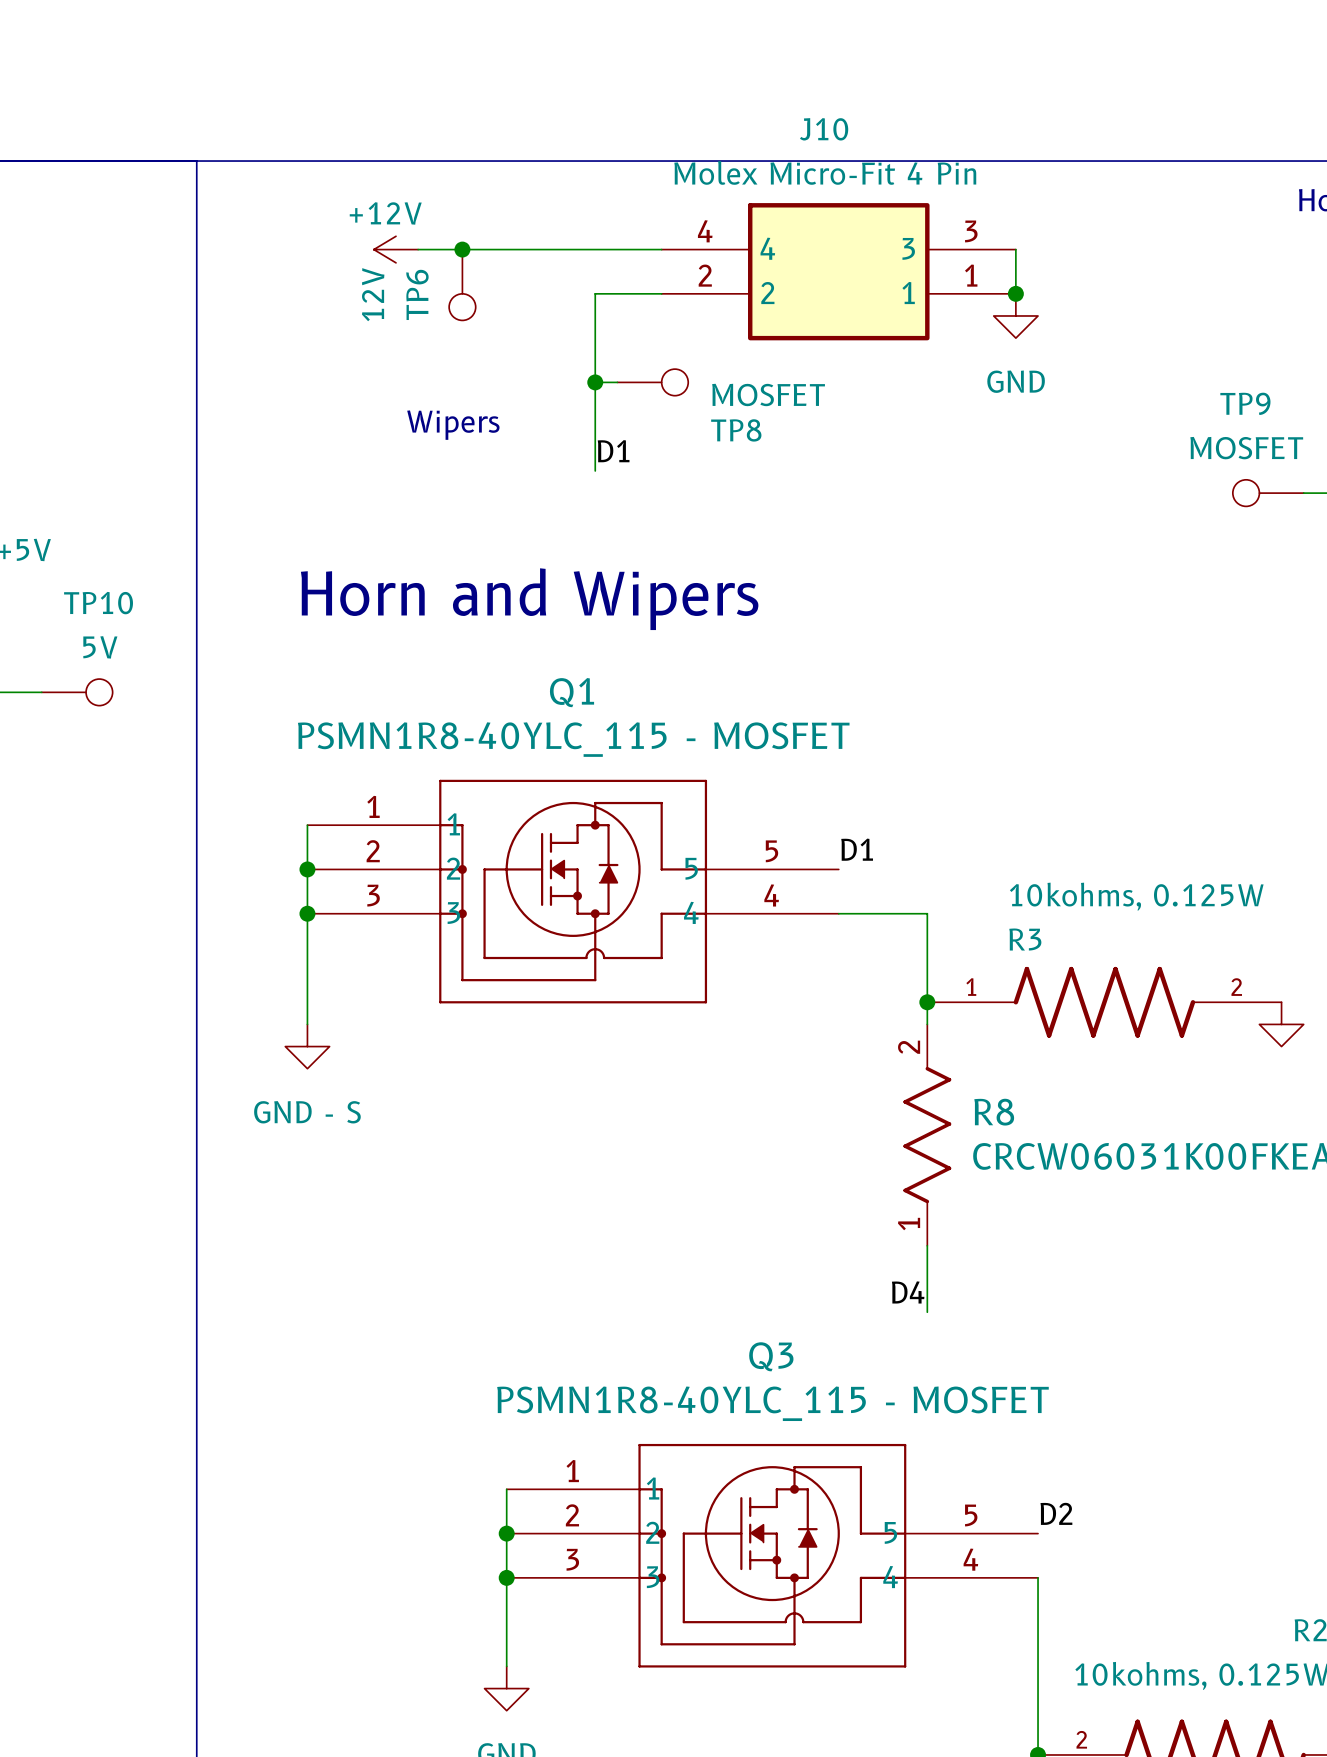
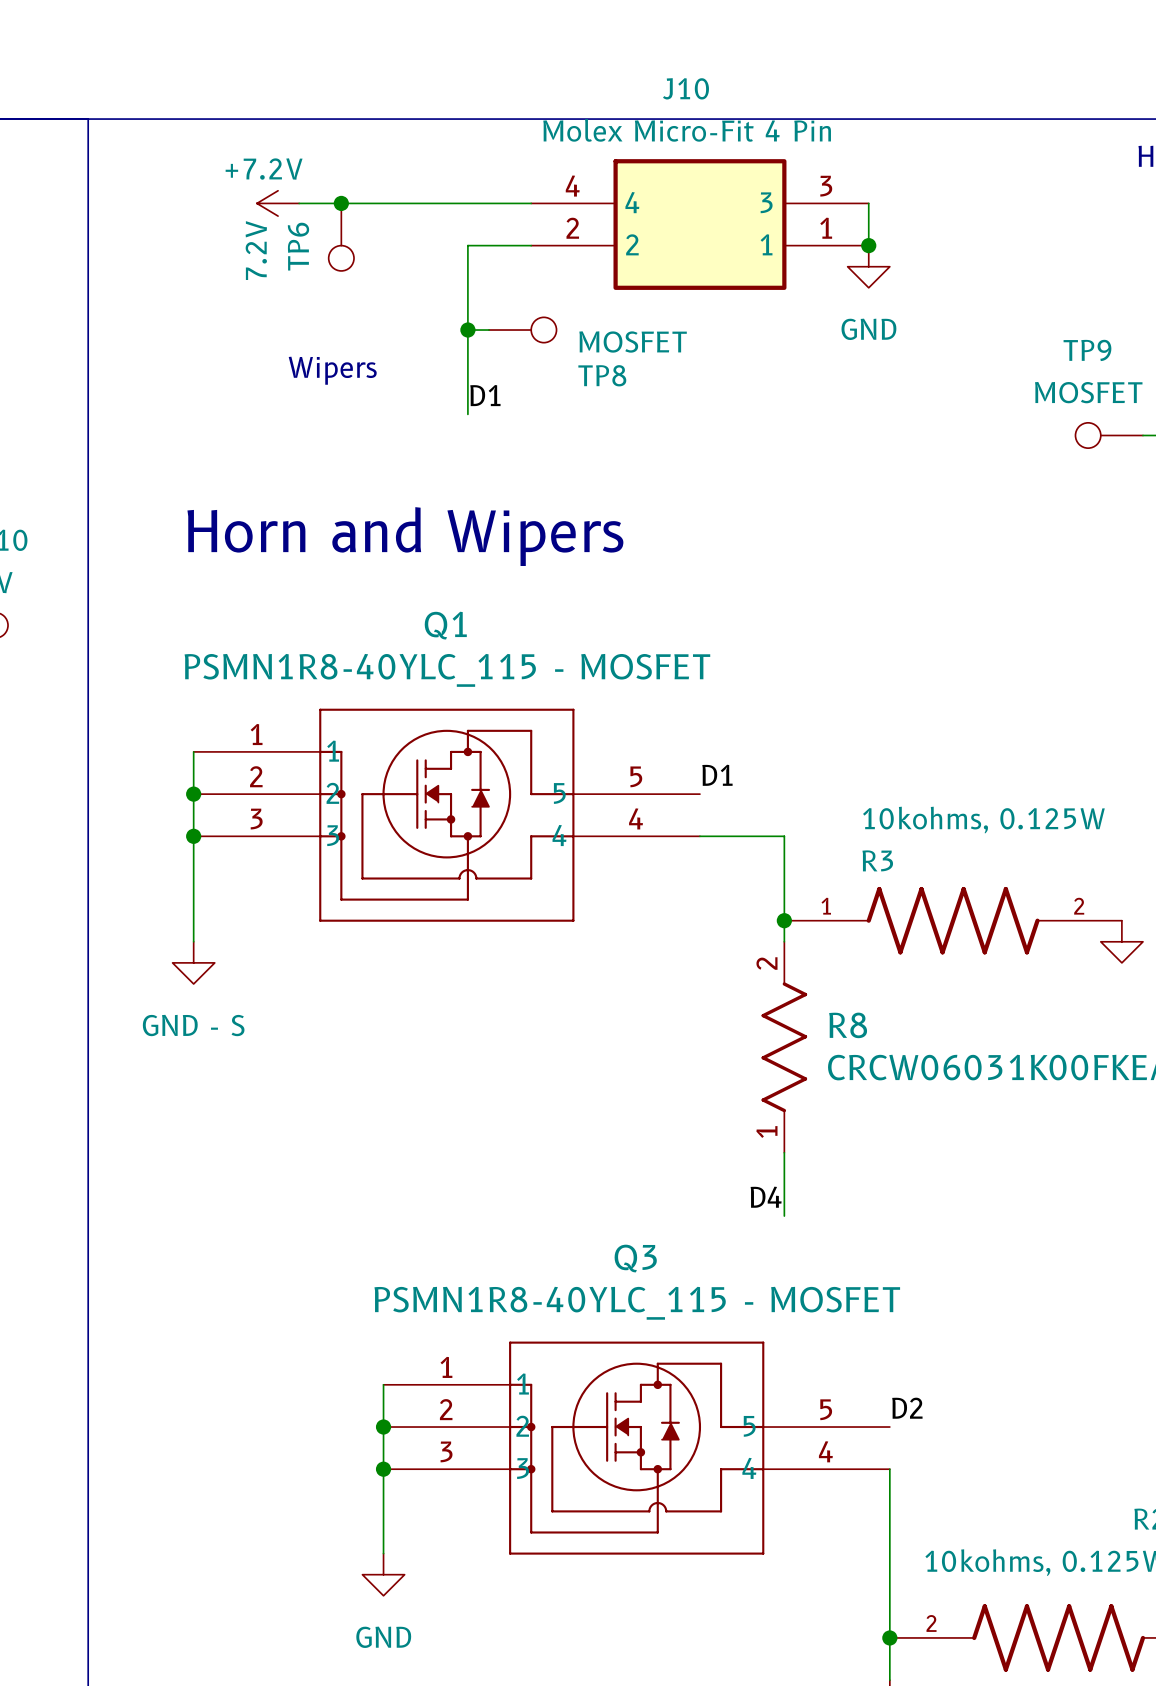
power symbol: +12V (396, 249) -> +7.2V (278, 203)
TP6 value: 12V (373, 294) -> 7.2V (256, 250)

